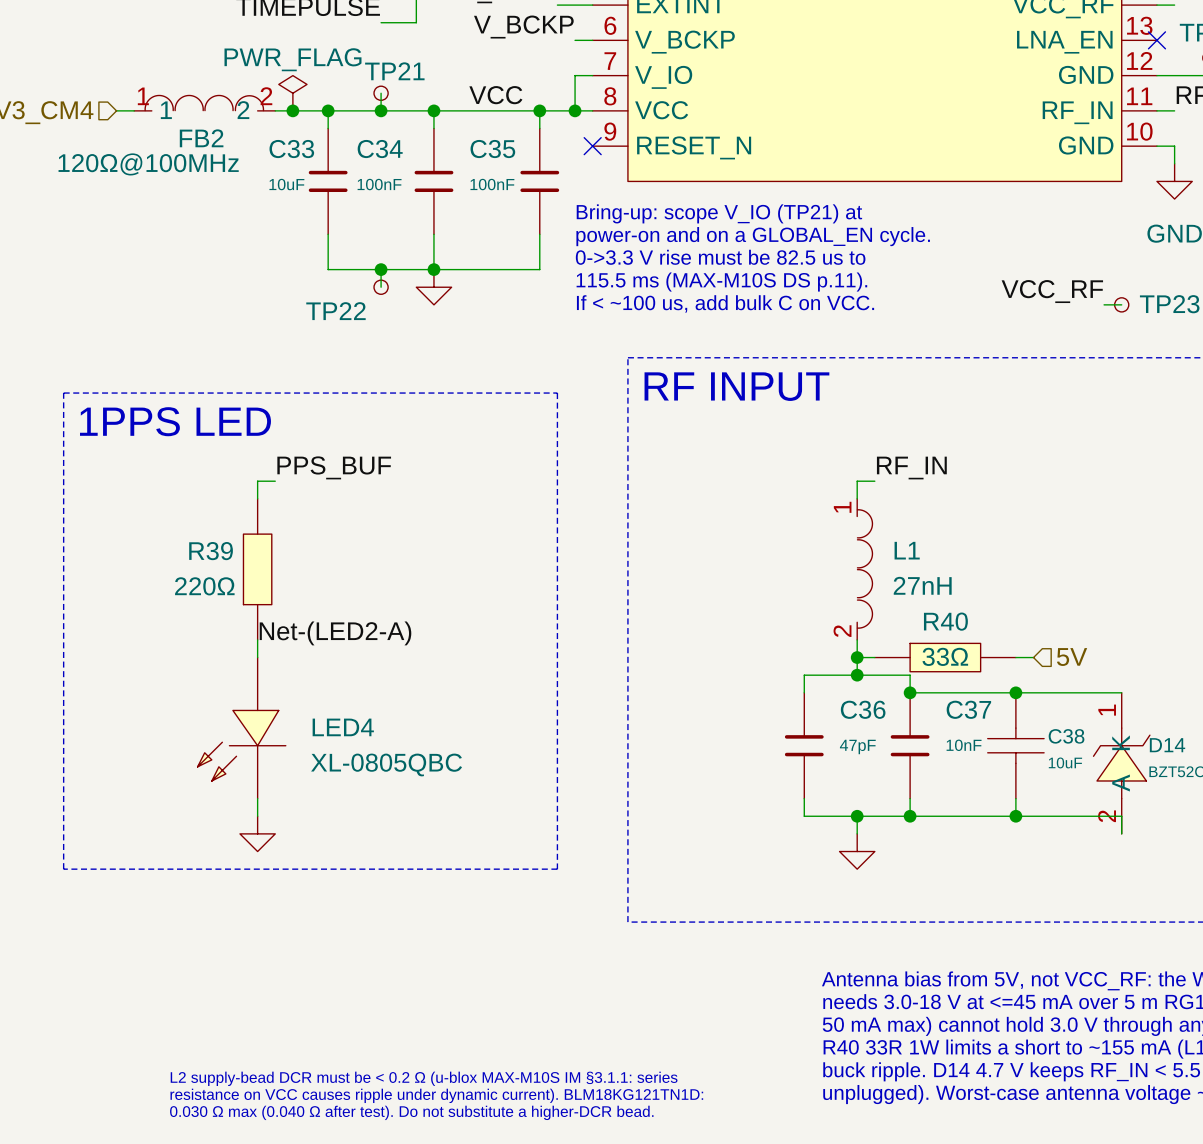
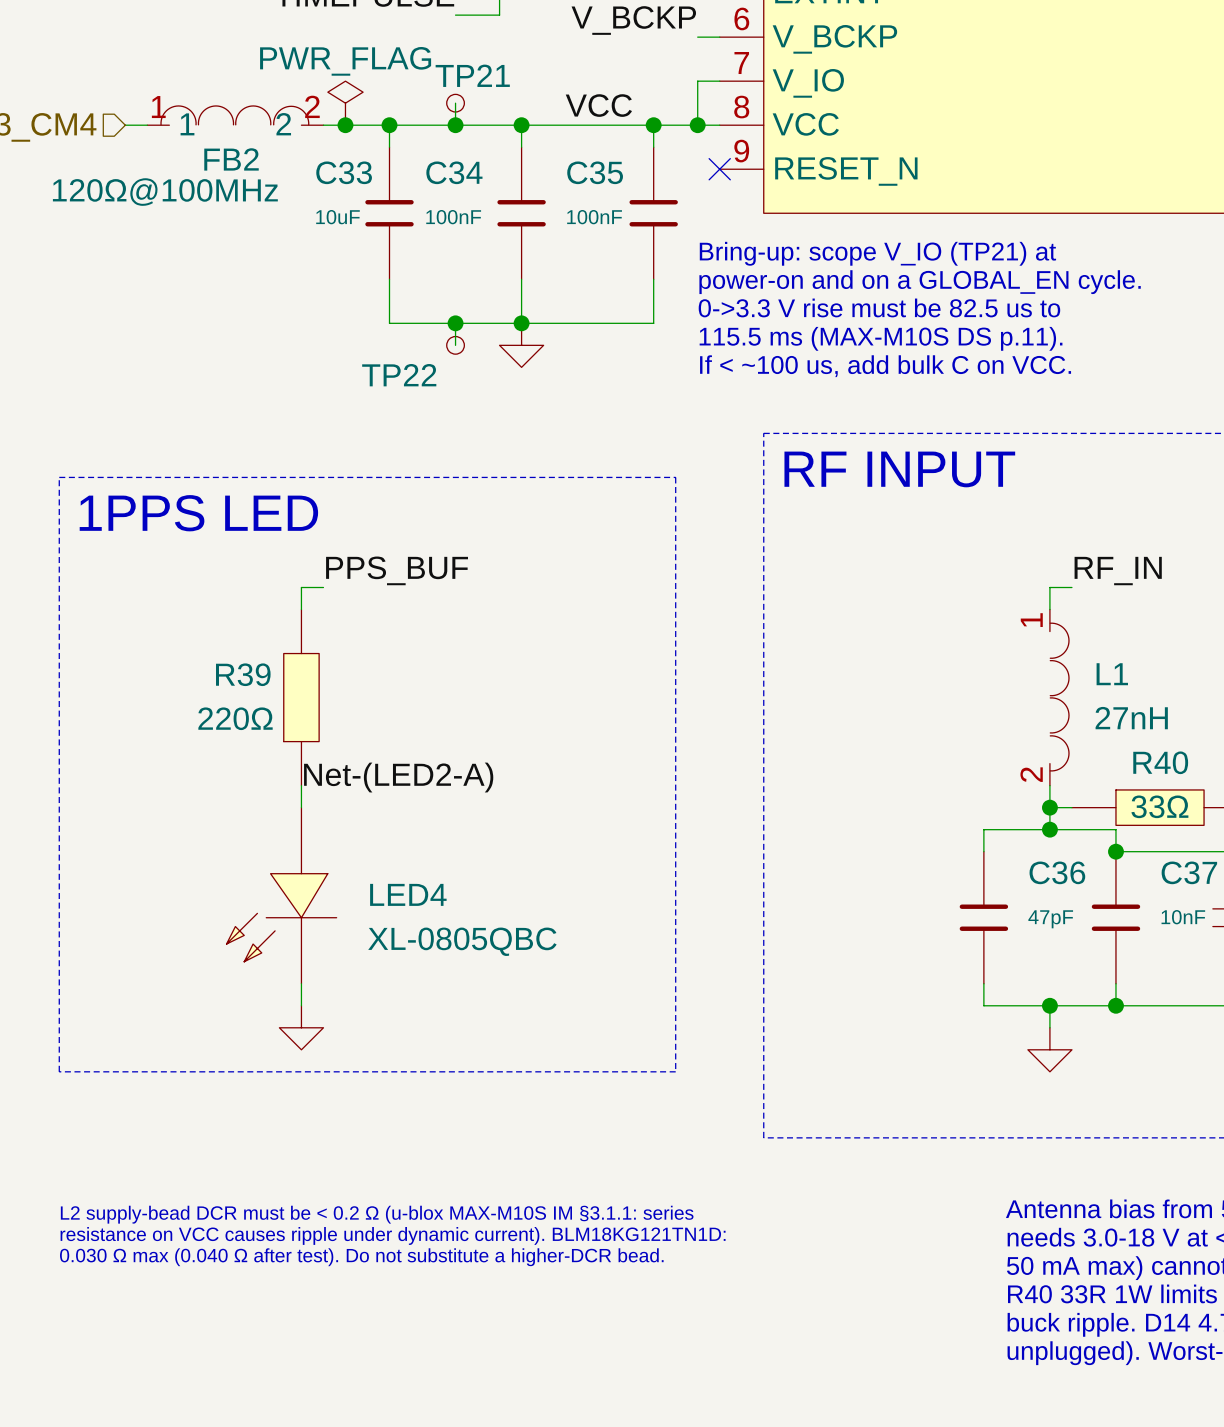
text position: L2 supply-bead DCR must be < 0.2 Ω (u-blox MAX-M10S IM §3.1.1: series (424, 1078) -> L2 supply-bead DCR must be < 0.2 Ω (u-blox MAX-M10S IM §3.1.1: series (377, 1214)
text position: resistance on VCC causes ripple under dynamic current). BLM18KG121TN1D: (436, 1095) -> resistance on VCC causes ripple under dynamic current). BLM18KG121TN1D: (393, 1235)
text position: 0.030 Ω max (0.040 Ω after test). Do not substitute a higher-DCR bead. (411, 1112) -> 0.030 Ω max (0.040 Ω after test). Do not substitute a higher-DCR bead. (361, 1257)

